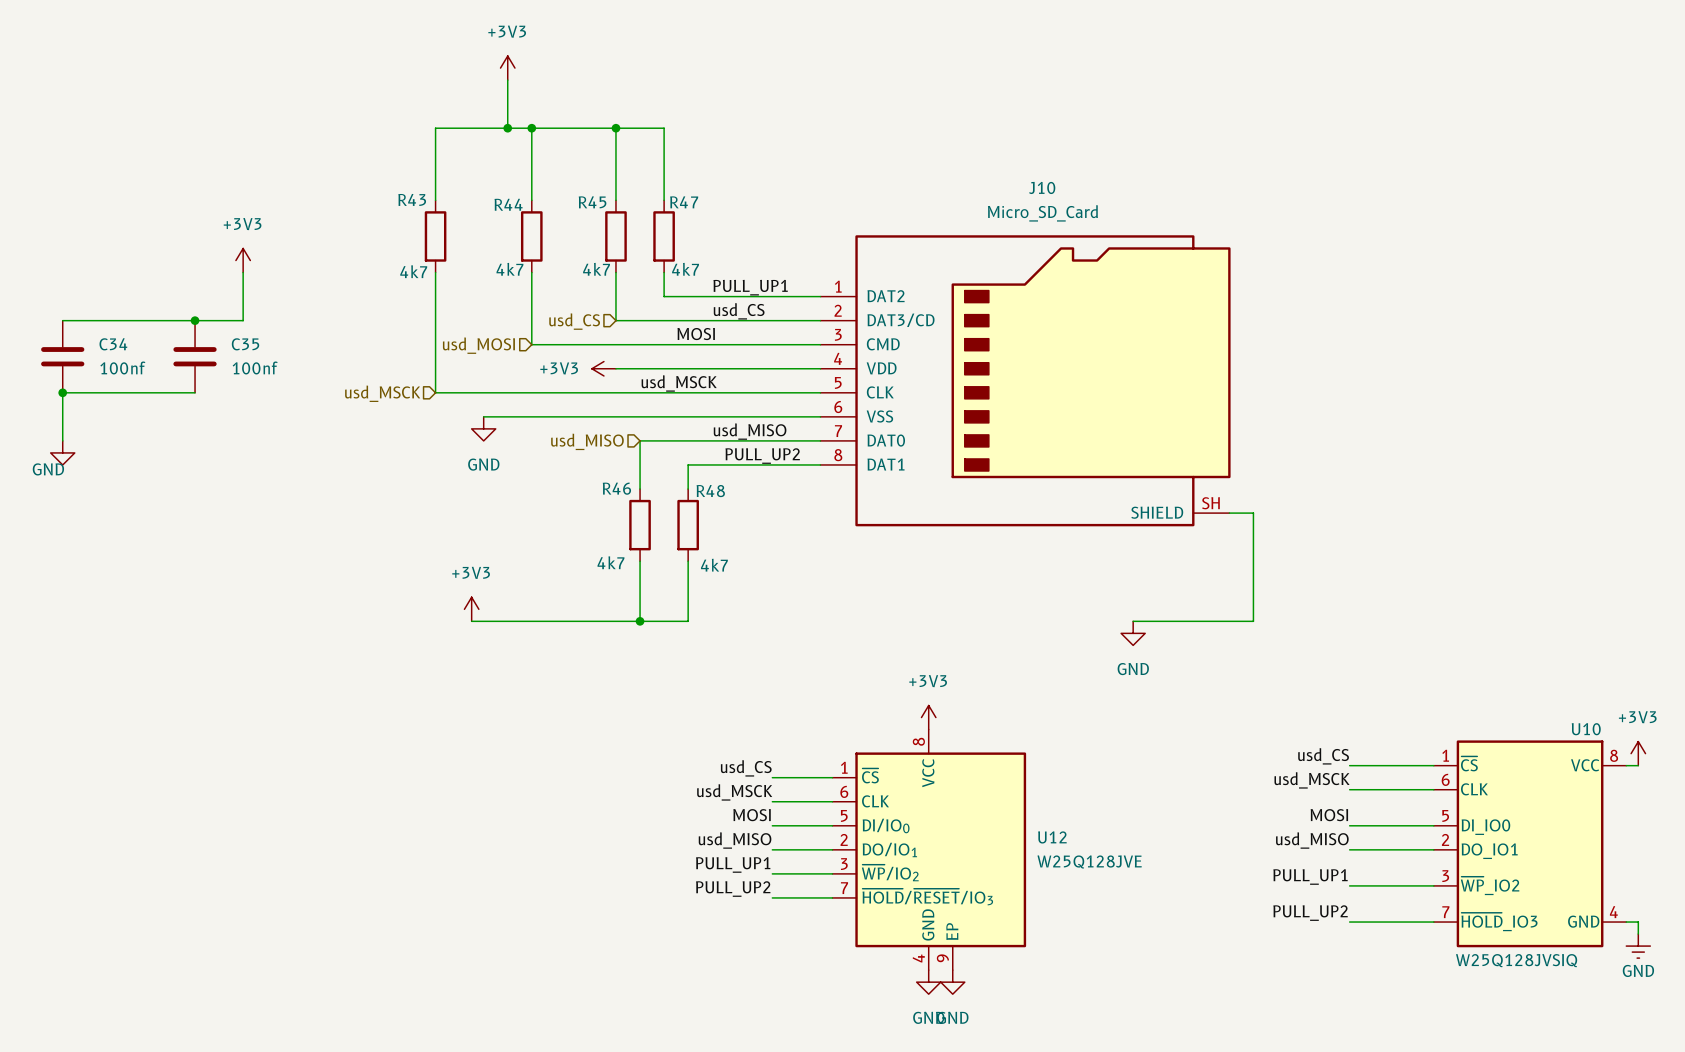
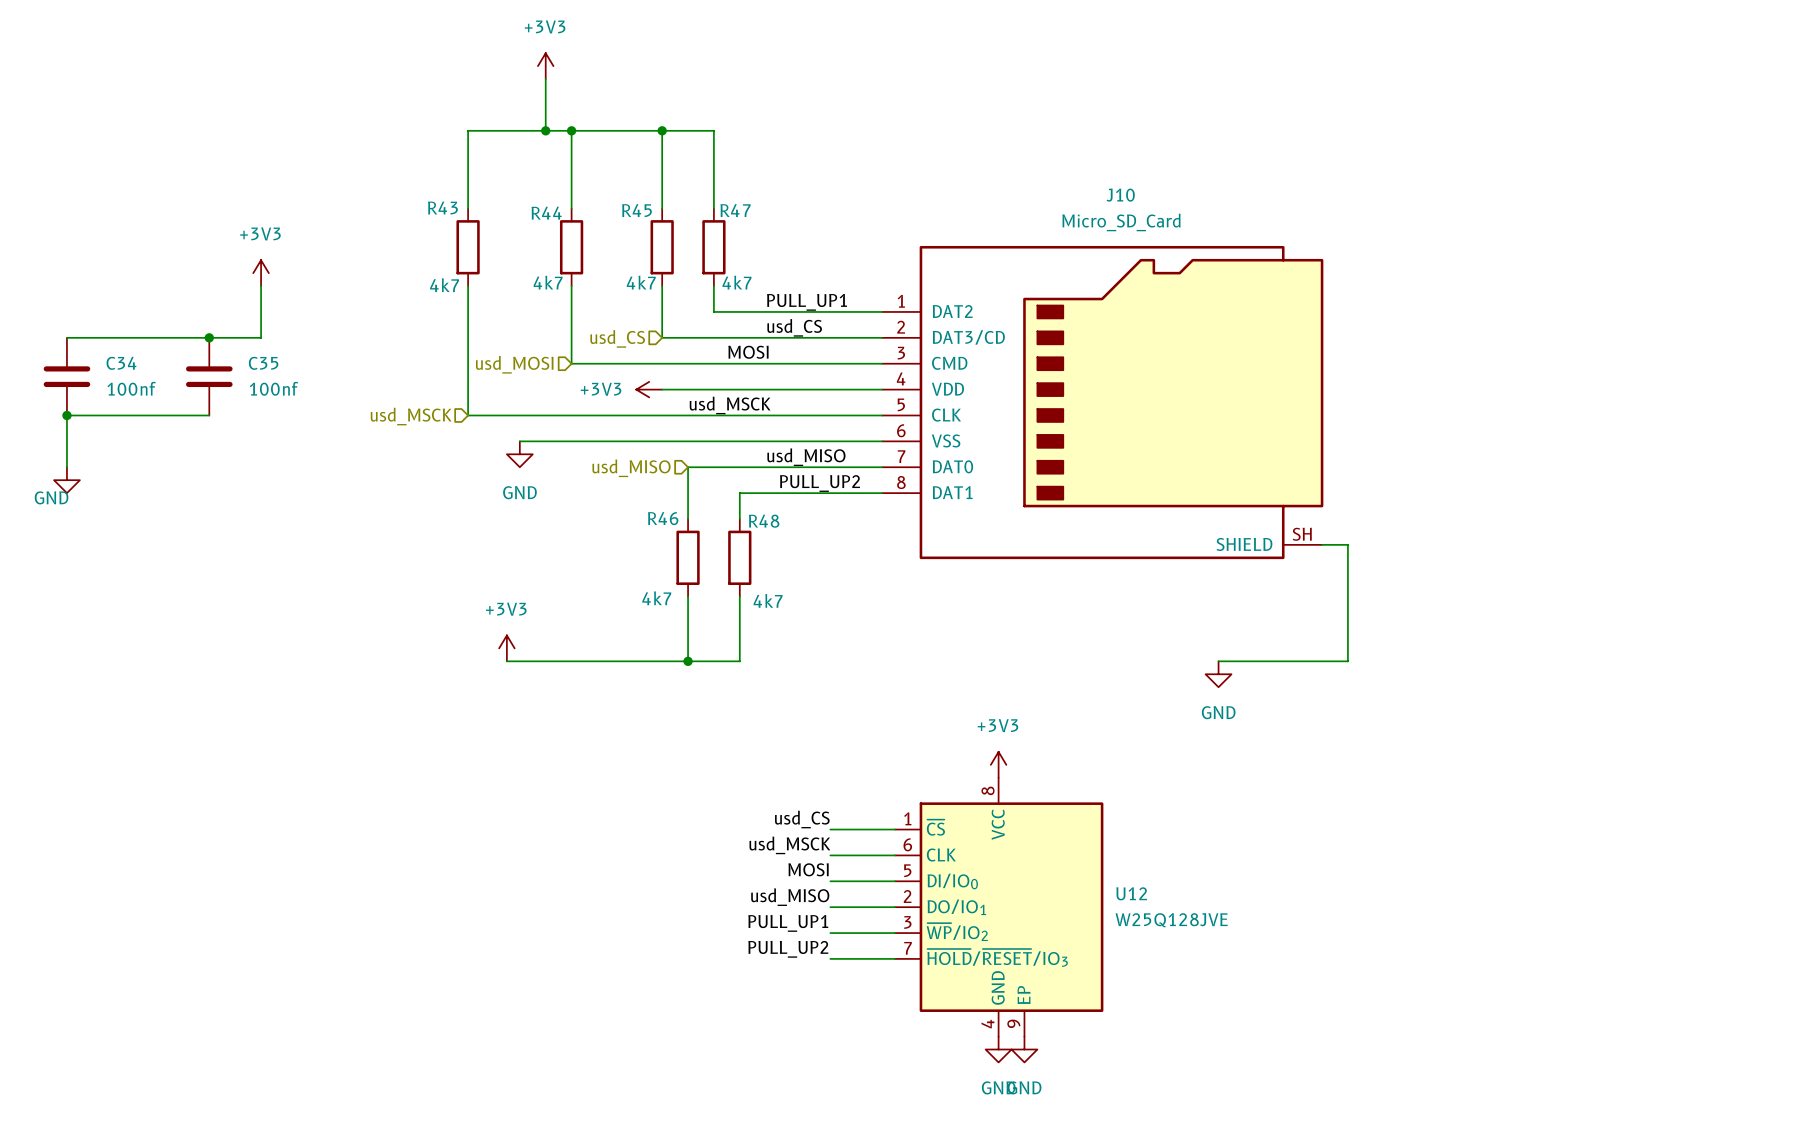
power symbol: +3V3 (1638, 753) -> none
label: usd_CS (1323, 756) -> none
wire: (1349, 765) (1433, 765) -> none
wire: (1626, 765) (1638, 765) -> none
label: usd_MSCK (1312, 780) -> none
wire: (1349, 789) (1433, 789) -> none
label: MOSI (1329, 815) -> none
wire: (1349, 825) (1433, 825) -> none
label: usd_MISO (1312, 840) -> none
U10: W25Q128JVSIQ (1530, 843) -> none
wire: (1349, 849) (1433, 849) -> none
label: PULL_UP1 (1310, 877) -> none
wire: (1349, 885) (1433, 885) -> none
label: PULL_UP2 (1310, 913) -> none
wire: (1349, 922) (1433, 922) -> none
wire: (1626, 922) (1638, 922) (1638, 934) -> none
power symbol: GND (1638, 946) -> none

